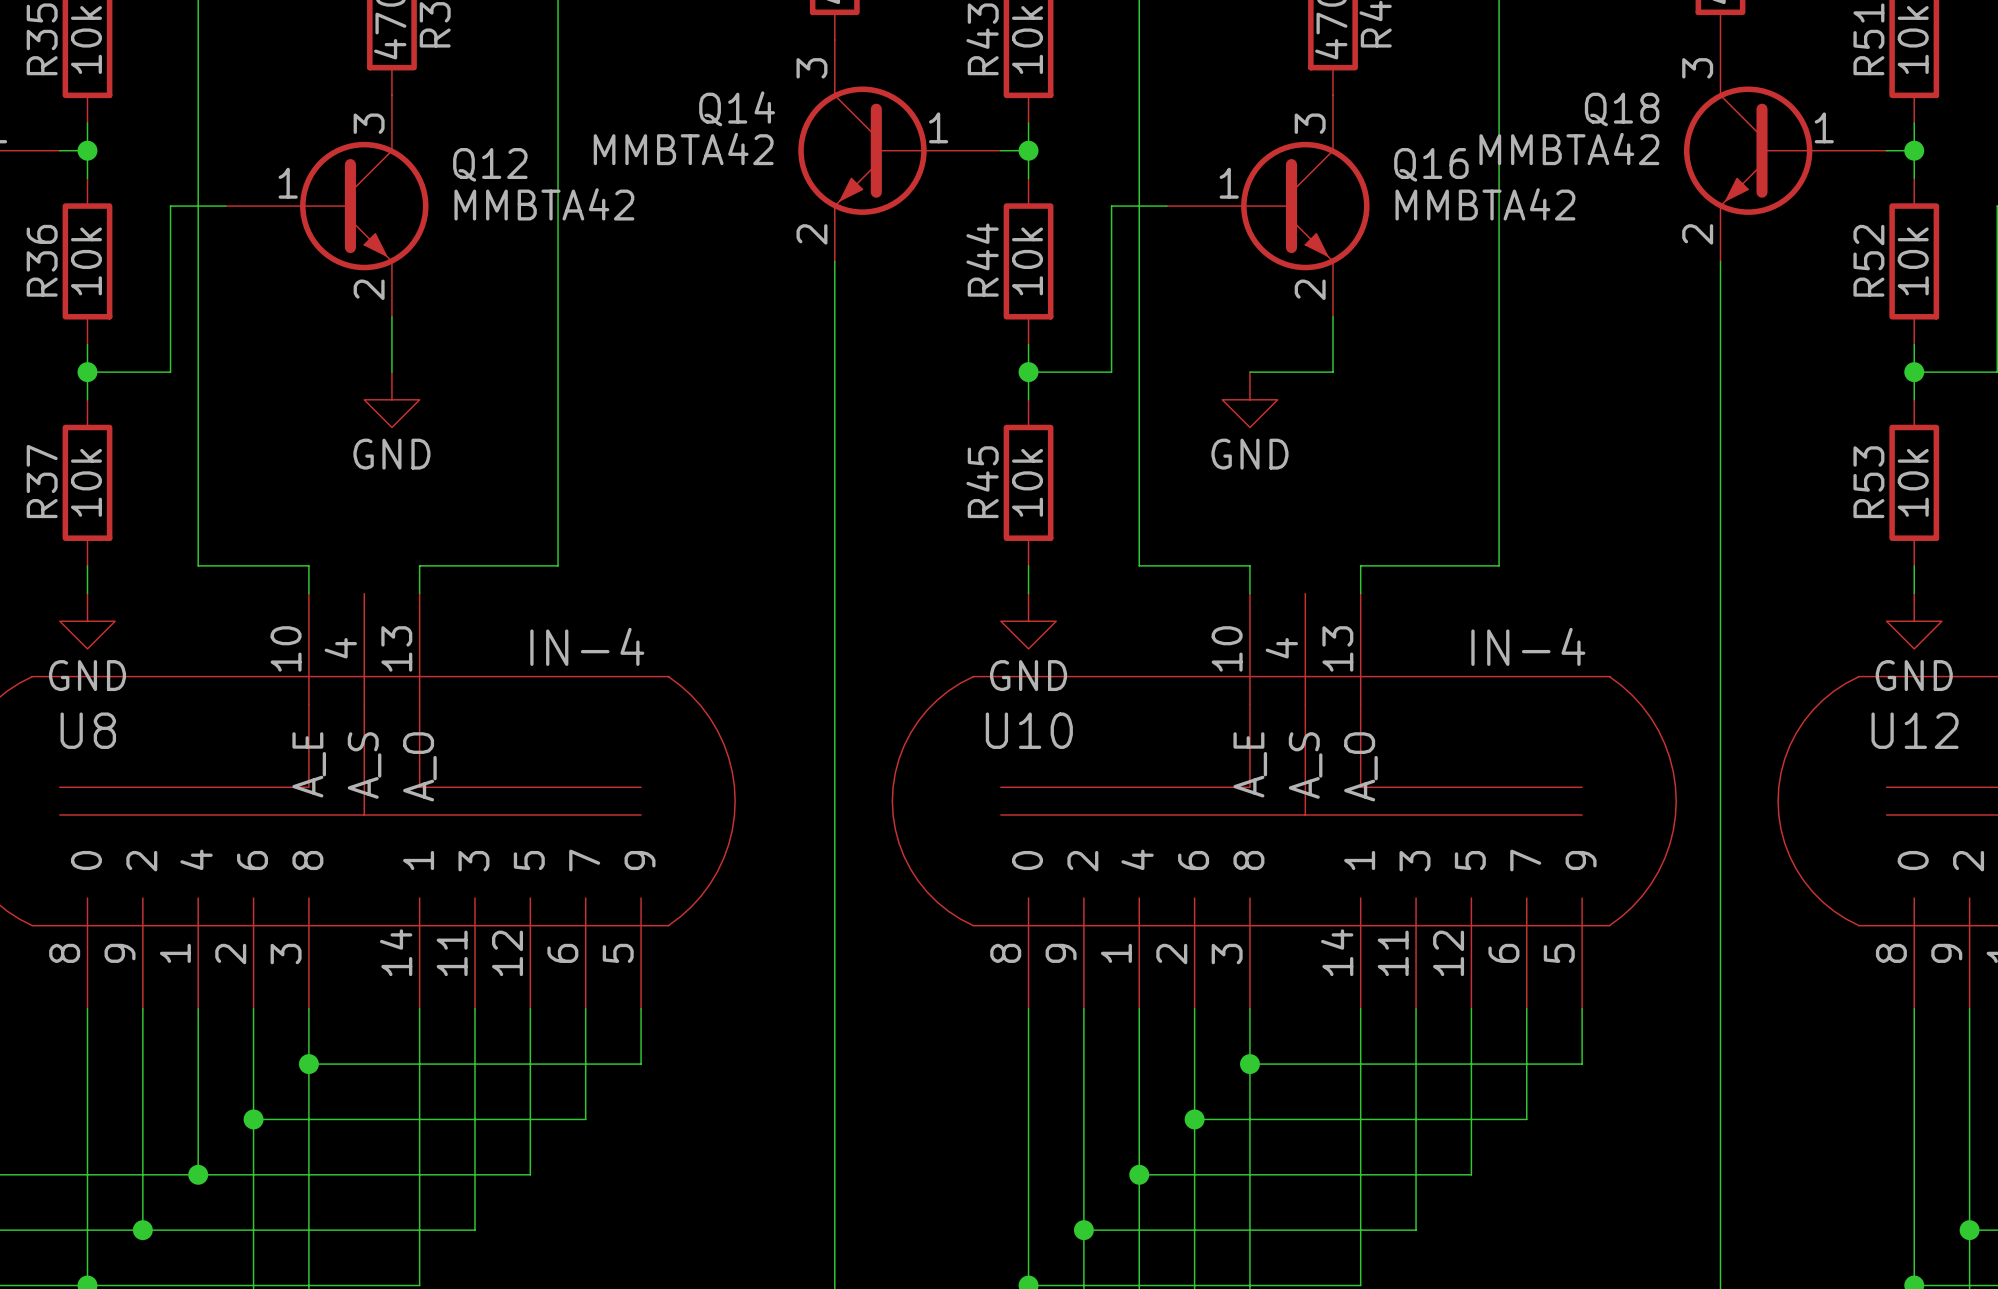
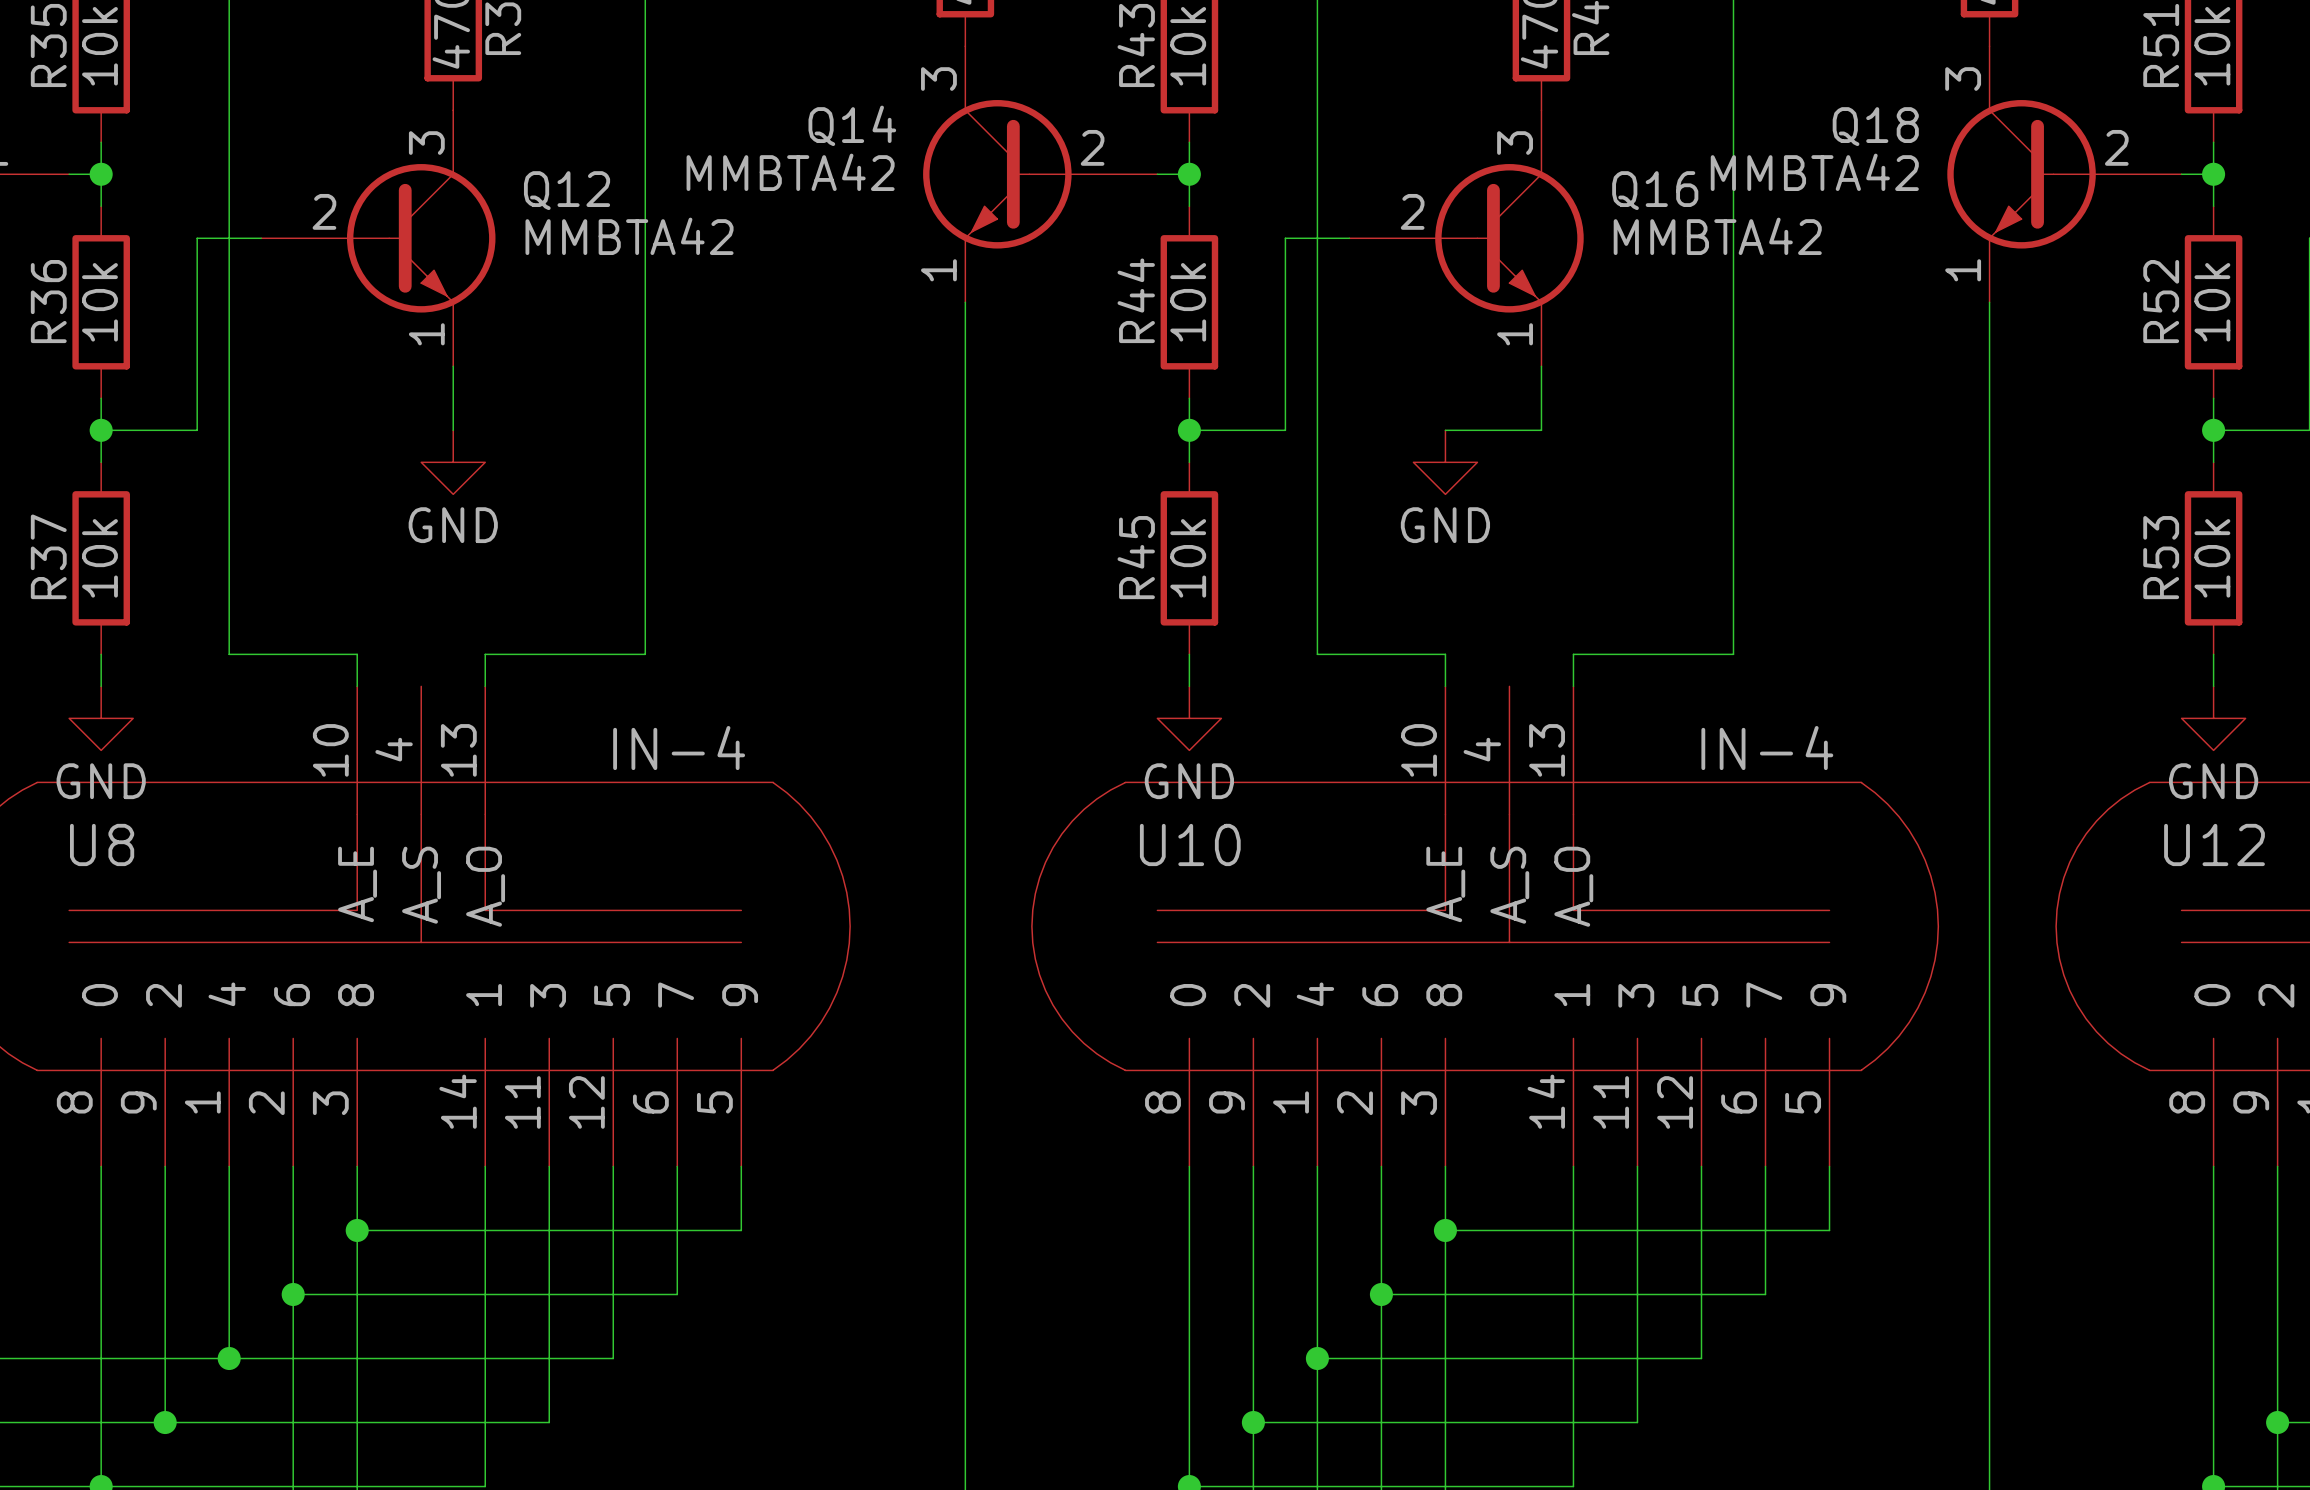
Q14 symbol: [798, 39, 1001, 262] -> [923, 46, 1158, 303]
Q18 symbol: [1683, 39, 1887, 262] -> [1947, 46, 2182, 303]
Q12 symbol: [225, 95, 429, 317] -> [261, 110, 496, 367]
Q16 symbol: [1166, 95, 1370, 317] -> [1349, 110, 1584, 367]

